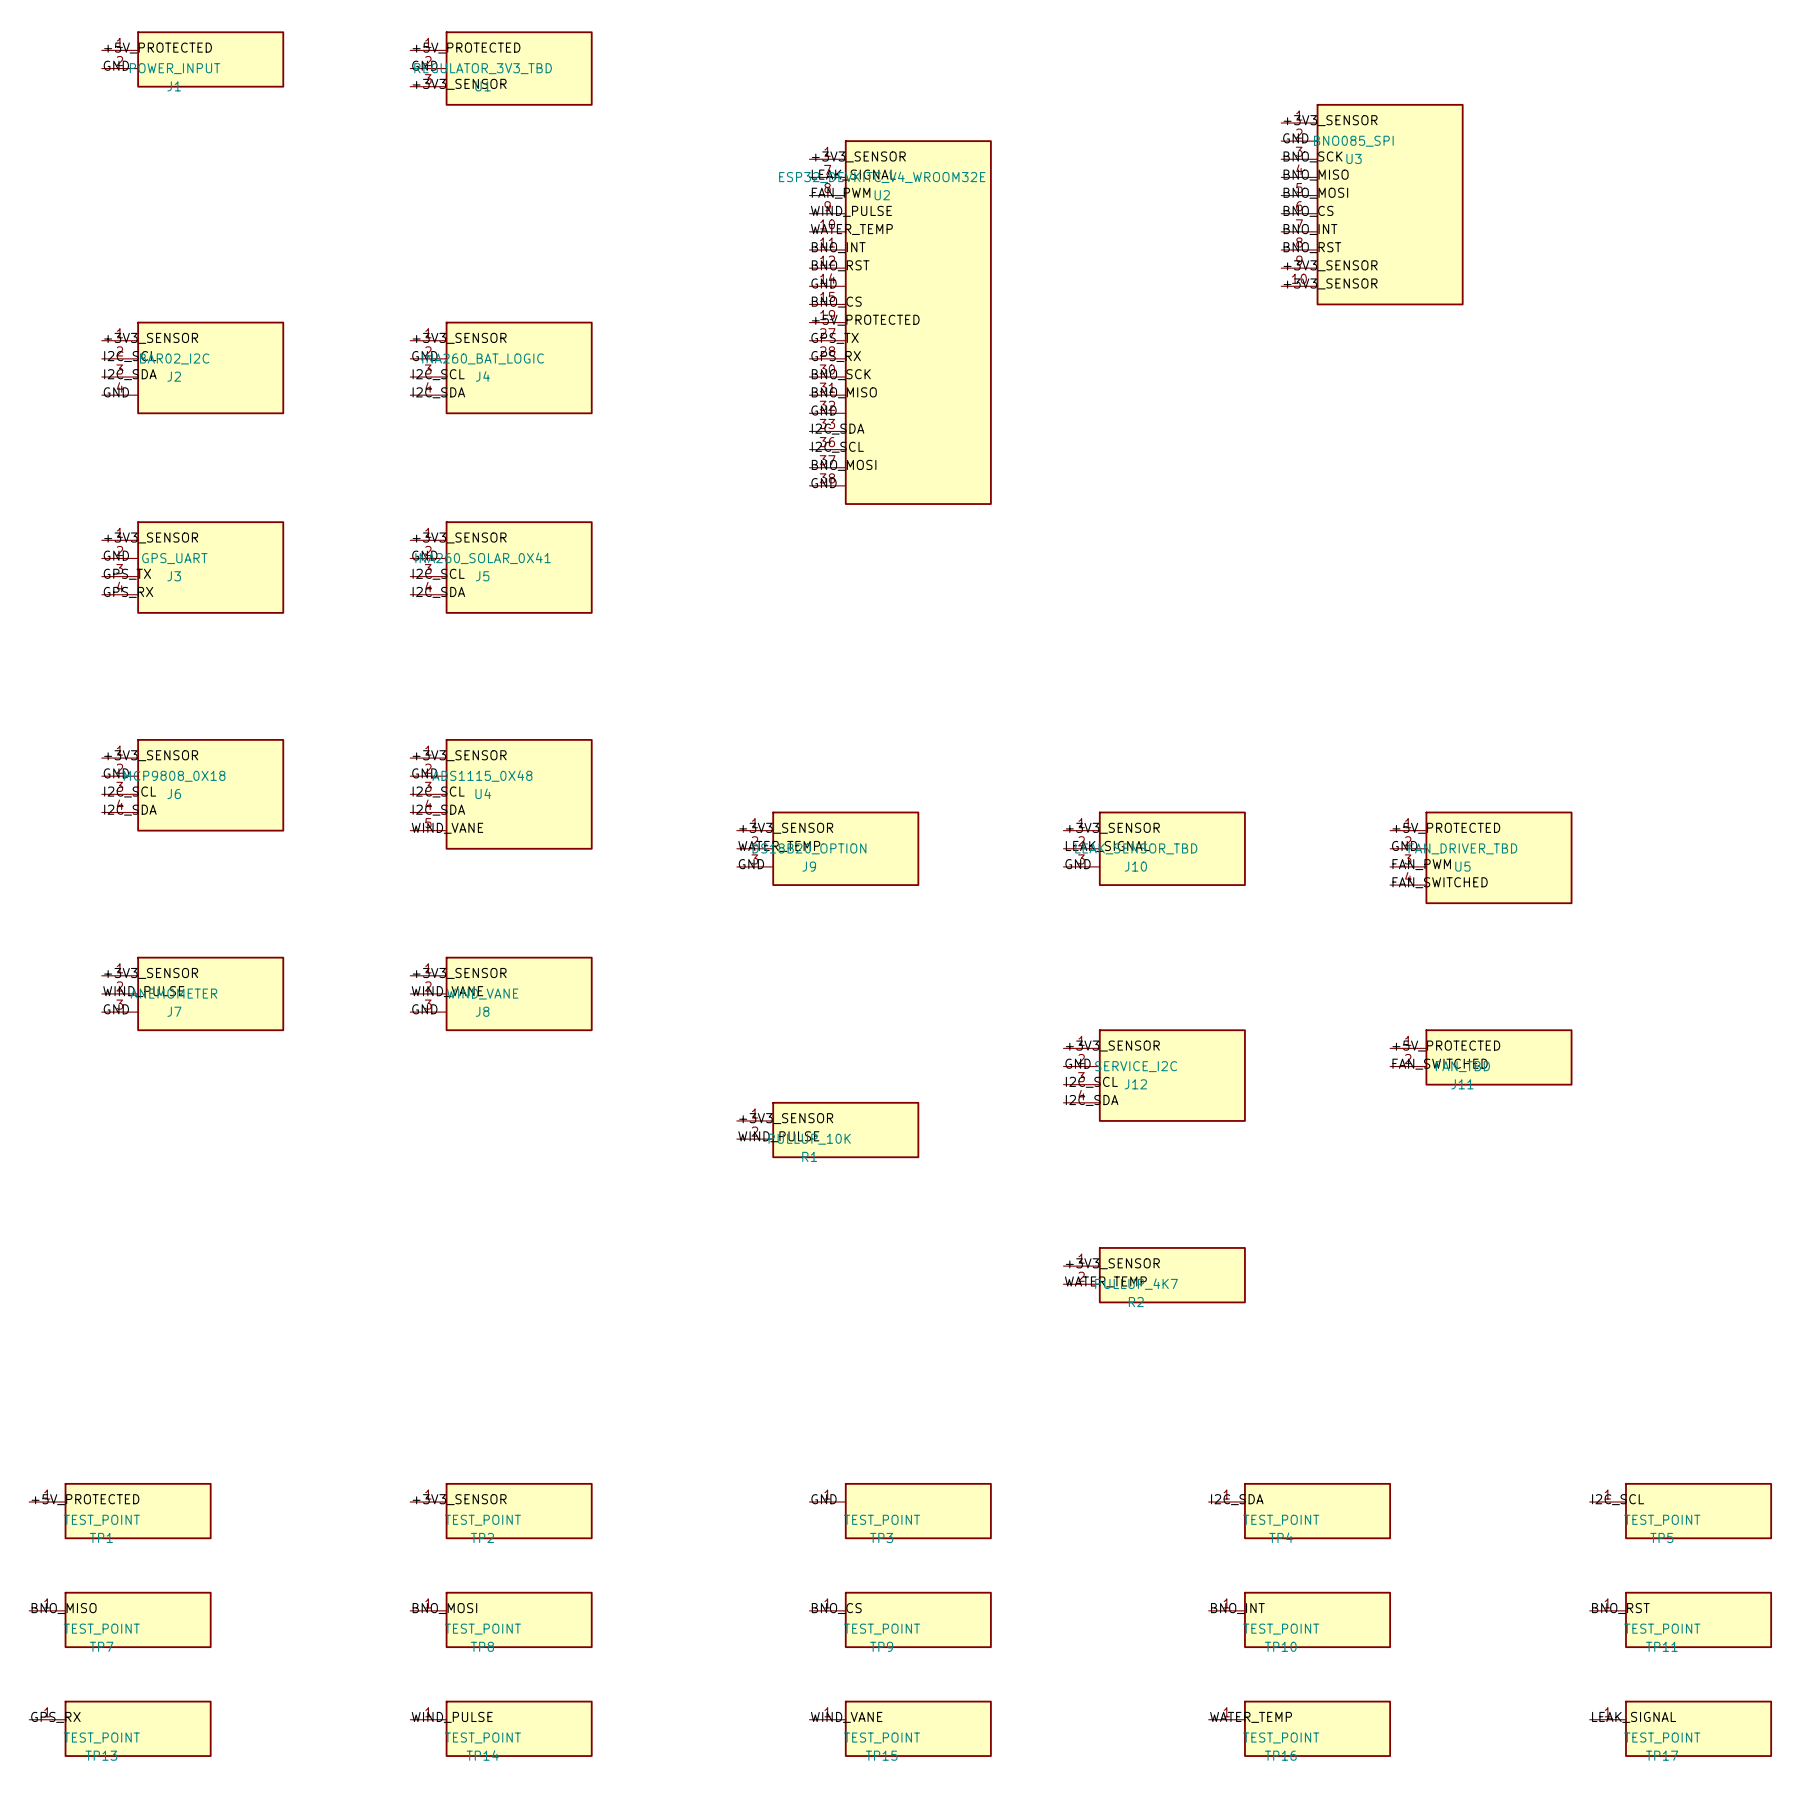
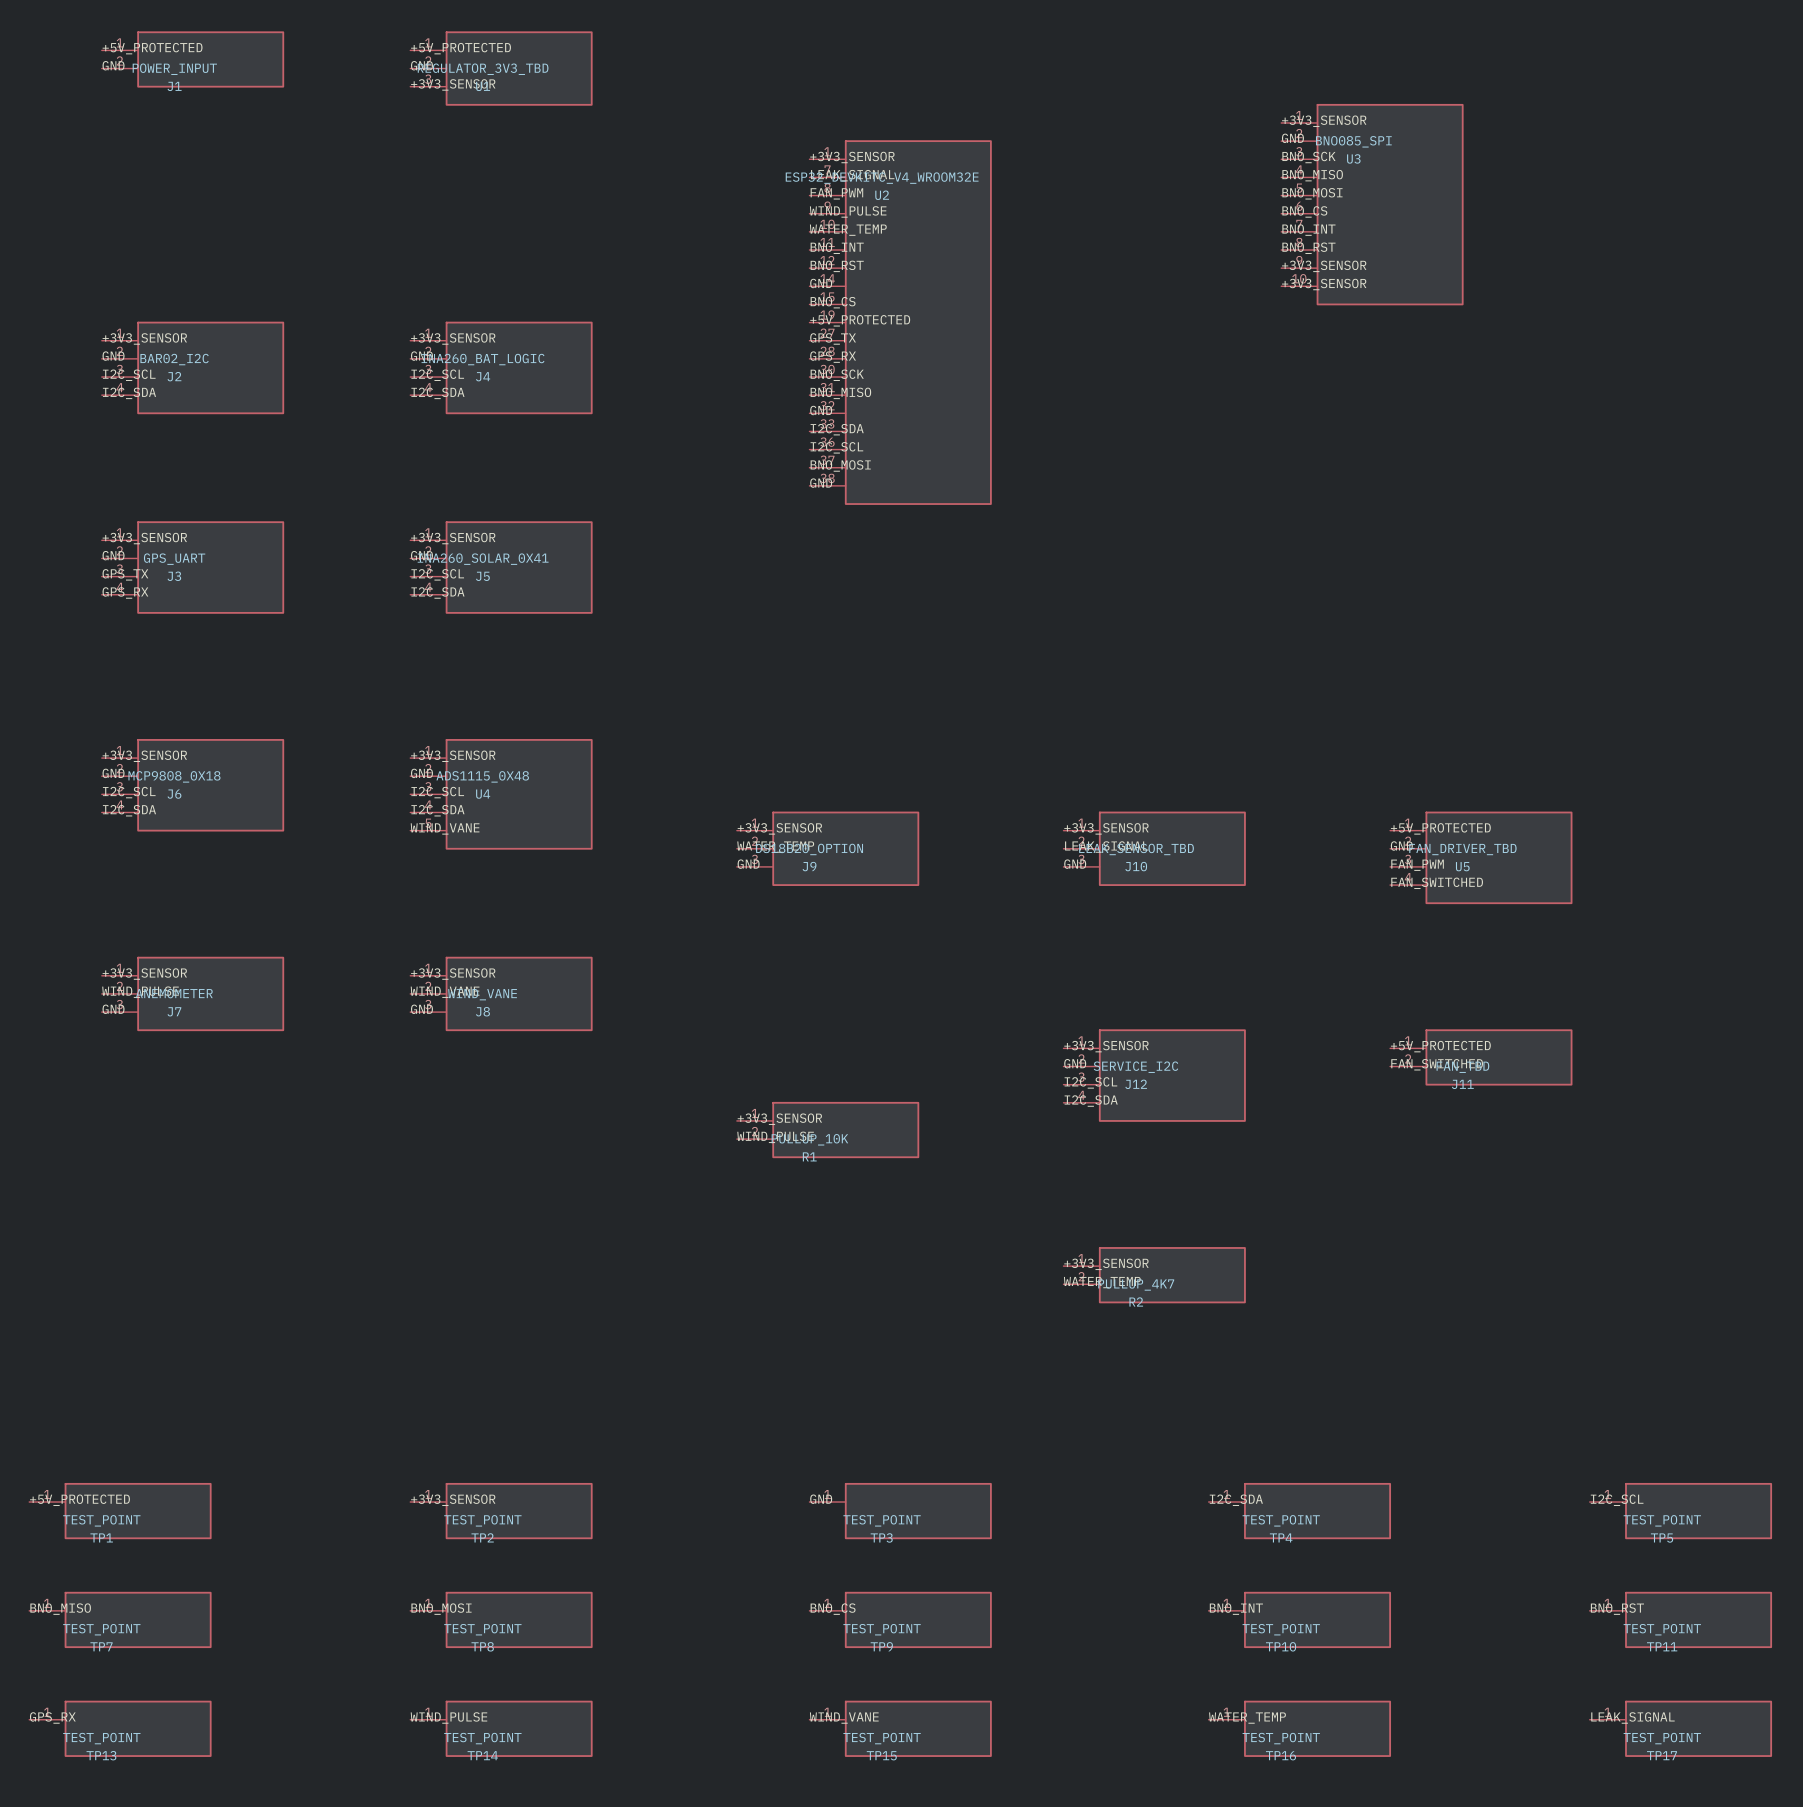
label: I2C_SCL (130, 356) -> GND (113, 356)
label: I2C_SDA (130, 374) -> I2C_SCL (129, 375)
label: GND (116, 392) -> I2C_SDA (129, 393)

